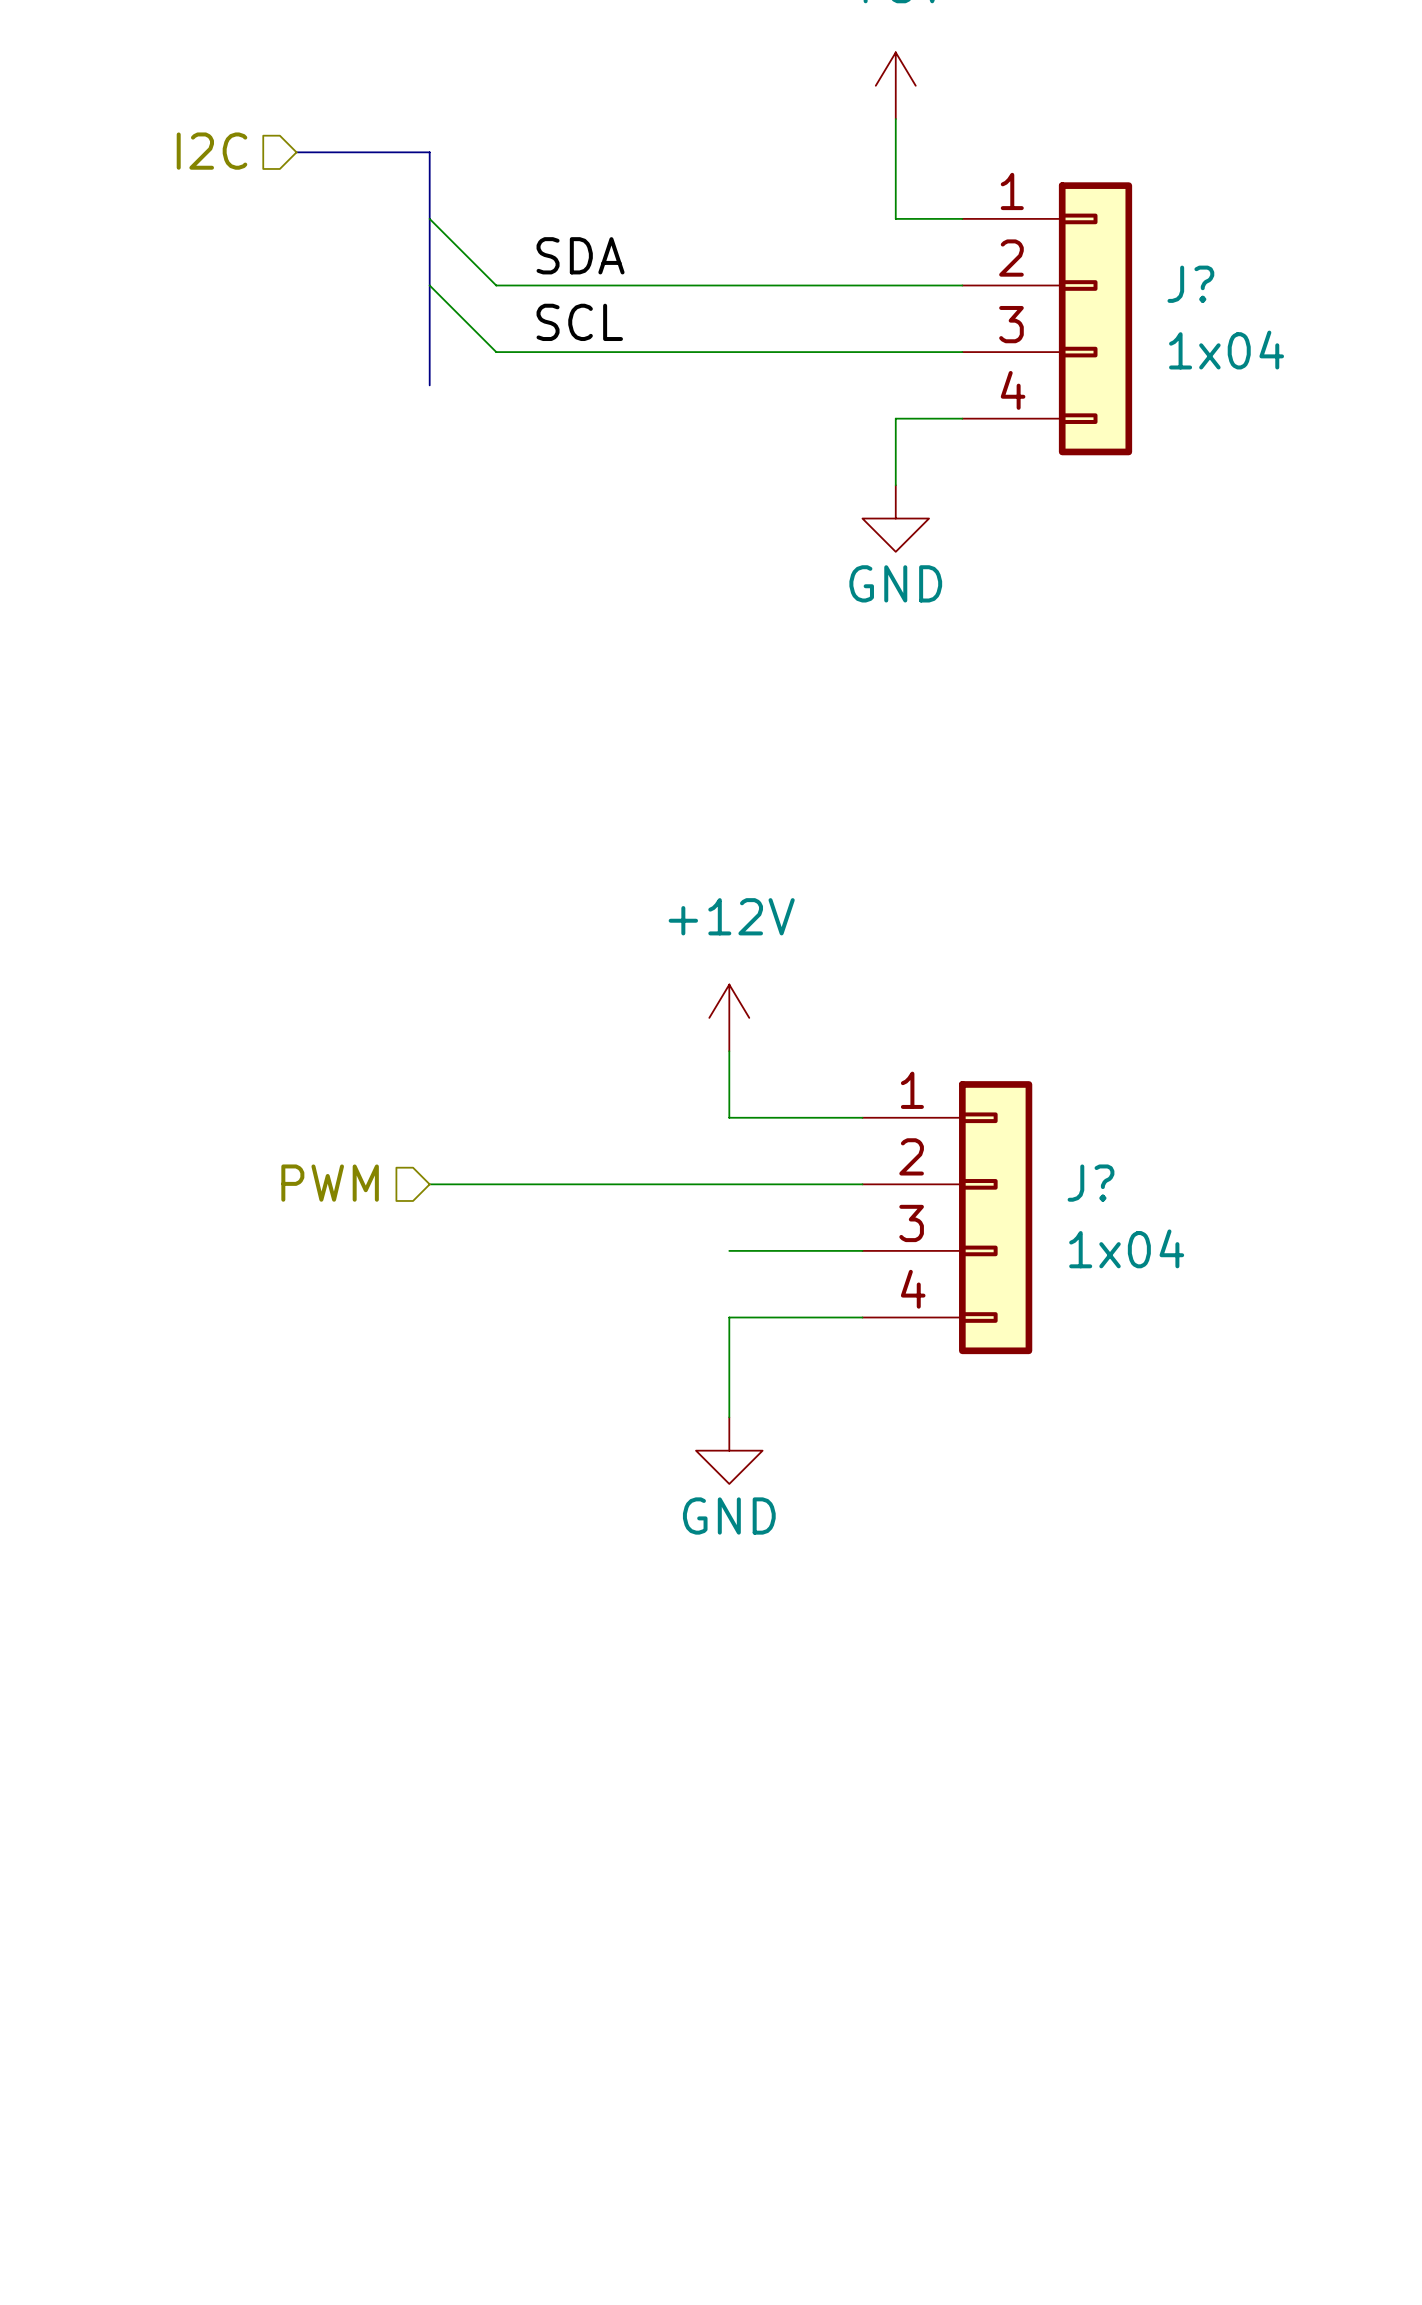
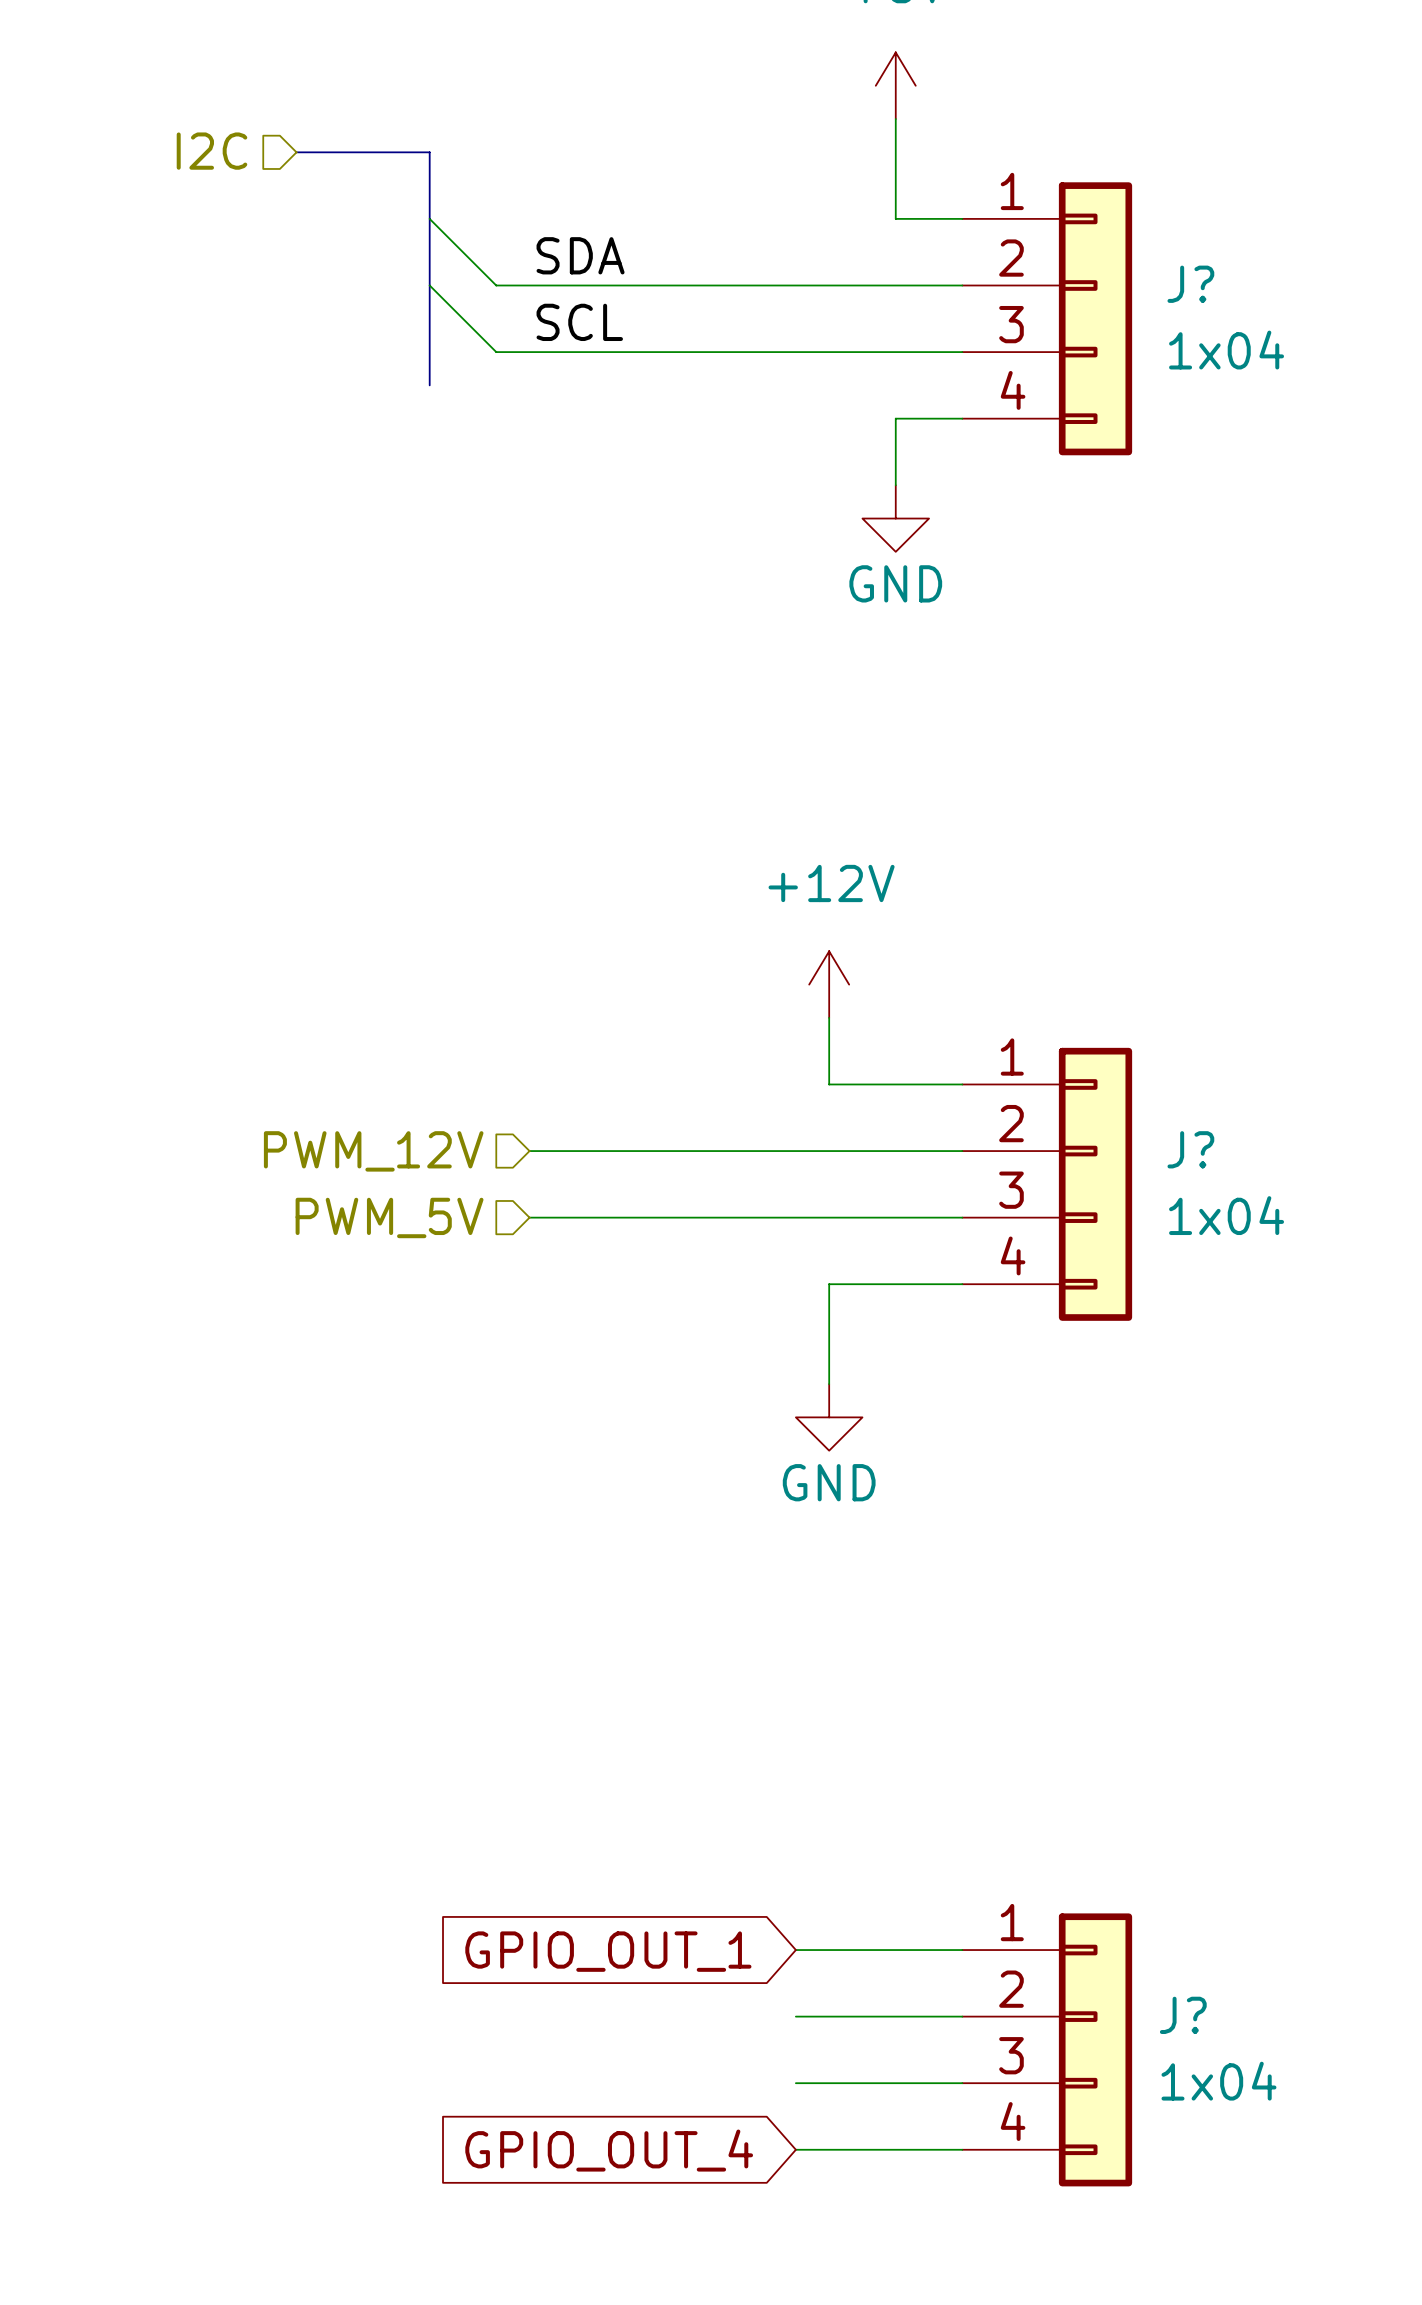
power symbol position: +12V (729, 1017) -> +12V (829, 984)
wire: (729, 1051) (729, 1117) (862, 1117) -> (829, 1017) (829, 1084) (962, 1084)
hierarchical label: none -> PWM_12V (373, 1151)
hierarchical label: PWM (330, 1183) -> PWM_5V (389, 1217)
wire: (429, 1184) (862, 1184) -> (529, 1151) (962, 1151)
wire: none -> (529, 1217) (962, 1217)
J? position: (947, 1217) -> (1047, 1184)
wire: (729, 1250) (862, 1250) -> none
wire: (862, 1317) (729, 1317) (729, 1417) -> (962, 1284) (829, 1284) (829, 1384)
power symbol position: GND (729, 1450) -> GND (829, 1417)
wire: none -> (795, 1950) (962, 1950)
global label: none -> GPIO_OUT_1 (608, 1951)
wire: none -> (795, 2016) (962, 2016)
J?: none -> (1047, 2049)
wire: none -> (795, 2083) (962, 2083)
wire: none -> (795, 2149) (962, 2149)
global label: none -> GPIO_OUT_4 (609, 2150)

